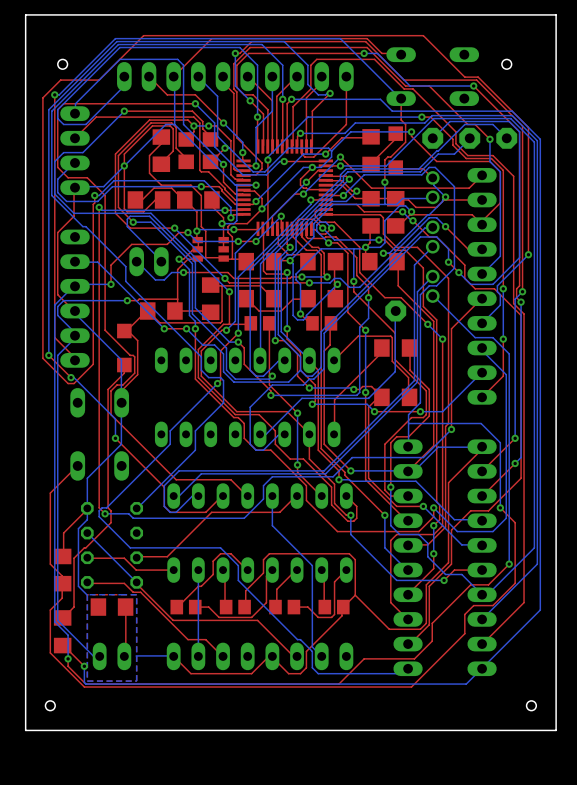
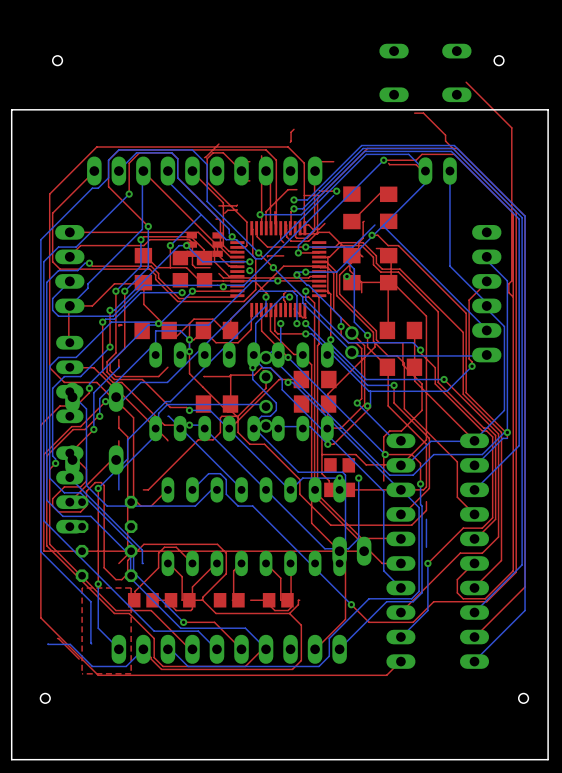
top track: (235, 53) (239, 53) (251, 41) (365, 41) (404, 80) (476, 80) (522, 125) (522, 291) -> none
bottom track: (235, 53) (235, 86) (250, 100) -> none
via: (235, 53) -> none
top track: (364, 53) (248, 53) (236, 65) (236, 87) (244, 94) (253, 94) (267, 109) (267, 146) -> none
bottom track: (364, 53) (377, 53) (410, 86) (473, 86) -> none
via: (364, 53) -> none
top track: (401, 54) (381, 53) (367, 38) (211, 38) (173, 76) -> none
bottom track: (124, 76) (124, 86) (85, 124) (63, 124) (57, 118) (57, 109) (119, 47) (239, 47) (257, 65) (257, 117) -> none
top track: (149, 76) (167, 94) (195, 94) (223, 123) -> none
bottom track: (173, 76) (174, 124) -> none
bottom track: (198, 76) (217, 96) (217, 136) (253, 171) (264, 171) (288, 148) (328, 148) (331, 151) -> none
top track: (223, 76) (223, 83) (233, 93) (233, 168) (243, 170) -> none
part position: (235, 76) -> (204, 171)
top track: (247, 76) (272, 100) (272, 146) -> none
bottom track: (272, 76) (272, 111) (256, 127) (256, 165) -> none
top track: (297, 76) (276, 96) (277, 146) -> none
top track: (321, 76) (321, 83) (306, 97) (306, 146) -> none
top track: (346, 76) (346, 124) (313, 157) (304, 157) (301, 154) (301, 146) -> none
via: (473, 86) -> none
top track: (330, 93) (312, 111) (311, 146) -> none
bottom track: (330, 93) (318, 94) (307, 84) (307, 65) (284, 41) (116, 41) (48, 109) (48, 266) -> (129, 194) (76, 247) (58, 247) (43, 261)
via: (330, 93) -> none
top track: (54, 94) (54, 198) -> (304, 228) (304, 163) (288, 147) (96, 147) (49, 194)
bottom track: (54, 94) (59, 94) (115, 38) (340, 38) (401, 98) -> none
via: (54, 94) -> none
top track: (401, 98) (401, 120) (405, 124) (405, 142) (390, 157) (384, 160) (384, 182) -> none
top track: (282, 99) (282, 146) -> none
bottom track: (282, 99) (282, 65) (262, 44) (118, 44) (51, 111) (51, 195) (125, 266) (125, 281) (201, 356) (201, 370) (208, 377) (220, 377) (223, 380) (223, 402) (195, 430) (195, 450) (136, 508) -> none
via: (282, 99) -> none
top track: (291, 99) (287, 103) (287, 146) -> none
bottom track: (291, 99) (380, 99) (392, 111) (512, 111) (540, 139) (540, 610) (532, 617) -> (293, 199) (307, 199) (361, 145) (454, 145) (525, 216) (525, 610)
via: (291, 99) -> none
top track: (250, 100) (263, 114) (262, 146) -> none
via: (250, 100) -> none
top track: (195, 103) (63, 103) (57, 109) (57, 167) (68, 177) (87, 177) (105, 195) (105, 330) (130, 355) (134, 356) (134, 373) (122, 385) -> (189, 410) (186, 407) (170, 407) (142, 379) (117, 379)
bottom track: (195, 103) (214, 123) (214, 146) (242, 174) (266, 174) (279, 161) (284, 161) -> none
via: (195, 103) -> none
top track: (124, 111) (192, 111) (202, 121) (202, 128) (210, 136) (210, 139) -> none
bottom track: (124, 111) (82, 152) (63, 152) (54, 161) (54, 194) (74, 213) (150, 213) (229, 291) -> none
via: (124, 111) -> none
bottom track: (75, 113) (75, 103) (119, 59) (177, 59) (183, 65) (183, 124) (223, 164) -> none
board edge: (556, 113) (556, 14) (25, 14) (25, 730) (556, 730) -> (548, 109) (11, 109) (11, 759) (548, 759) (548, 722)
top track: (257, 117) (258, 146) -> none
via: (257, 117) -> none
bottom track: (421, 117) (307, 117) (267, 157) (267, 160) -> none
via: (421, 117) -> none
bottom track: (223, 123) (242, 142) (242, 152) -> none
via: (223, 123) -> none
bottom track: (174, 124) (235, 185) (256, 185) -> none
bottom track: (174, 124) (165, 124) (103, 186) (75, 187) -> none
via: (193, 125) -> none
top track: (208, 125) (216, 125) (230, 140) (230, 174) (235, 179) (243, 180) -> none
bottom track: (208, 125) (193, 125) -> none
via: (208, 125) -> none
top track: (411, 131) (411, 136) (436, 161) (489, 161) (500, 171) (500, 202) (482, 220) (482, 224) (472, 214) (410, 214) (399, 225) (395, 225) -> none
bottom track: (411, 131) (350, 131) (331, 151) -> none
via: (411, 131) -> none
bottom track: (300, 133) (344, 133) (355, 123) (424, 123) (432, 115) (512, 115) (537, 140) (537, 564) (529, 571) -> (293, 208) (302, 208) (363, 148) (452, 148) (522, 217) (522, 564)
via: (300, 133) -> none
top track: (395, 133) (395, 139) (371, 164) -> none
top track: (371, 136) (341, 137) (325, 154) -> none
top track: (161, 137) (161, 143) (149, 155) (149, 173) (161, 185) (190, 185) (201, 195) (201, 226) (205, 231) (205, 257) -> none
top track: (75, 138) (96, 117) (193, 117) (199, 123) (199, 170) (208, 171) (235, 199) (243, 199) -> none
bottom track: (432, 138) (450, 121) (509, 121) (519, 131) (519, 257) (492, 284) (470, 284) -> (474, 440) (504, 410) (504, 326) (486, 308) (486, 302) (463, 279)
part: (432, 138) -> none
bottom track: (469, 138) (454, 154) (438, 154) (420, 171) (347, 171) (343, 176) (343, 180) (260, 263) (260, 360) -> none
part: (469, 138) -> none
bottom track: (506, 138) (492, 124) (464, 124) (418, 168) (346, 168) (340, 174) (340, 179) (250, 269) (250, 370) (256, 376) (263, 376) (278, 361) (284, 360) -> none
part: (506, 138) -> none
top track: (186, 139) (193, 131) (193, 125) (188, 120) (149, 120) (115, 154) (115, 213) (130, 228) (174, 228) -> none
top track: (489, 139) (475, 124) (467, 124) (429, 86) (405, 86) (367, 47) (250, 47) (233, 63) (233, 88) (236, 91) (236, 137) (262, 162) (262, 168) (256, 174) (243, 175) -> none
bottom track: (489, 139) (489, 161) (500, 171) (500, 256) (482, 274) -> none
via: (489, 139) -> none
top track: (291, 146) (293, 106) (310, 88) (310, 65) (316, 59) (374, 59) (404, 88) (413, 88) (455, 131) (455, 143) (464, 152) -> (286, 232) (286, 236) (291, 241) (308, 241) (317, 232) (317, 198) (367, 148) (457, 148)
via: (225, 148) -> none
part position: (75, 150) -> (69, 269)
part: (161, 150) -> none
part position: (198, 150) -> (192, 269)
part: (371, 150) -> none
part: (395, 150) -> none
bottom track: (331, 151) (331, 157) (321, 167) (303, 167) (262, 208) -> none
top track: (242, 152) (243, 160) -> none
via: (242, 152) -> none
bottom track: (325, 154) (303, 154) (256, 201) -> none
via: (325, 154) -> none
top track: (467, 155) (492, 155) (513, 176) (513, 303) (524, 313) -> (458, 154) (516, 211) (516, 308)
top track: none -> (460, 151) (525, 216) (525, 587) (516, 595)
top track: (340, 157) (371, 188) (469, 188) (482, 175) -> none
bottom track: (340, 157) (303, 194) -> none
via: (340, 157) -> none
top track: (466, 158) (491, 158) (503, 170) (503, 288) -> none
via: (267, 160) -> none
top track: (325, 160) (284, 161) -> none
top track: (186, 161) (185, 157) (176, 148) (176, 127) (171, 123) (150, 123) (118, 155) (118, 207) (133, 222) -> none
via: (284, 161) -> none
bottom track: (75, 162) (57, 179) (57, 192) (66, 201) (97, 201) (112, 186) (201, 186) -> none
top track: (161, 164) (173, 151) (173, 128) (170, 125) (152, 125) (124, 154) (124, 208) (127, 211) (143, 211) (155, 199) (162, 199) -> none
top track: (223, 164) (223, 182) (235, 194) (243, 194) -> none
via: (223, 164) -> none
bottom track: none -> (383, 160) (298, 245) (298, 252)
via: (124, 165) -> none
via: (256, 165) -> none
bottom track: (340, 165) (386, 165) (433, 118) (510, 118) (534, 142) (534, 547) (488, 593) (482, 594) (461, 574) (445, 574) (427, 556) (427, 543) (418, 534) (399, 534) (390, 525) -> (400, 587) (383, 570) (383, 519)
via: (340, 165) -> none
top track: (312, 167) (300, 179) (300, 185) (307, 189) (325, 190) -> none
via: (312, 167) -> none
top track: (325, 170) (318, 170) (306, 182) -> none
bottom track: none -> (118, 171) (136, 152) (171, 152) (177, 158) (177, 177) (229, 229) (229, 233)
top track: none -> (143, 171) (217, 245) (217, 254) (229, 266) (237, 266)
bottom track: none -> (167, 171) (168, 182) (226, 239) (236, 239) (255, 258) (261, 258) (366, 154) (408, 154) (425, 171) (424, 183) (336, 272) (320, 272)
top track: none -> (192, 171) (223, 202) (223, 245) (229, 251) (237, 252)
top track: none -> (241, 171) (223, 152) (213, 152) (207, 158) (207, 182) (246, 222) (246, 245) (237, 247)
top track: none -> (266, 171) (270, 176) (271, 228)
top track: (325, 175) (346, 176) (349, 179) -> none
part: none -> (437, 171)
bottom track: none -> (449, 171) (451, 267)
bottom track: (432, 177) (433, 185) (445, 197) (389, 253) (383, 253) -> none
bottom track: (349, 179) (275, 253) (275, 340) -> none
via: (349, 179) -> none
top track: (325, 180) (341, 180) (352, 191) (356, 191) -> none
bottom track: (306, 182) (235, 253) (235, 321) (226, 330) -> none
via: (306, 182) -> none
bottom track: (384, 182) (384, 204) -> none
via position: (384, 182) -> (383, 160)
bottom track: (236, 185) (236, 220) (233, 223) (222, 223) -> none
via: (256, 185) -> none
top track: (325, 185) (341, 185) (355, 198) (408, 199) (415, 207) (436, 207) (444, 199) (482, 199) -> none
top track: (201, 186) (219, 186) (235, 204) (253, 204) (256, 201) -> none
via: (201, 186) -> none
top track: (75, 187) (74, 216) (57, 232) -> (94, 171) (52, 213) (52, 227)
part position: (284, 187) -> (278, 269)
part: (432, 187) -> none
top track: (243, 190) (254, 191) (262, 198) (262, 208) (247, 223) (230, 223) (227, 226) (227, 232) (232, 236) (232, 259) -> none
bottom track: (356, 191) (346, 201) (331, 201) (296, 236) (296, 250) (281, 260) (281, 331) (309, 360) -> none
via: (356, 191) -> none
via: (303, 194) -> none
top track: (94, 195) (93, 364) (74, 383) (68, 383) (42, 358) (42, 97) (60, 80) (99, 80) (143, 35) (423, 35) (464, 77) (478, 77) (528, 127) (528, 254) -> none
bottom track: (94, 195) (99, 195) (113, 180) (204, 180) (230, 207) (230, 217) -> none
via: (94, 195) -> none
bottom track: (343, 195) (364, 174) (421, 174) (429, 167) (435, 167) (454, 186) (454, 268) (436, 285) (429, 285) (420, 294) (420, 402) (408, 414) (408, 446) -> (357, 403) (394, 439) (400, 440)
top track: none -> (388, 190) (382, 191) (351, 221)
bottom track: (432, 197) (402, 198) (396, 204) (333, 204) (313, 223) (313, 236) (290, 260) (293, 263) (293, 315) (297, 319) (303, 319) (337, 284) -> none
via: (445, 197) -> none
top track: none -> (129, 194) (129, 163) (139, 152) (171, 152) (177, 158) (177, 177) (220, 220) (220, 247) (230, 257) (237, 257)
via: none -> (129, 194)
top track: (135, 199) (142, 199) (153, 188) (171, 188) (196, 211) (198, 247) -> none
part: (149, 199) -> none
part: (198, 199) -> none
top track: (211, 199) (213, 207) (223, 217) (223, 249) -> none
bottom track: (310, 199) (310, 204) (238, 276) (238, 333) -> none
via: (310, 199) -> none
bottom track: none -> (333, 195) (243, 285) (143, 285) (112, 316) (58, 316)
via: (256, 201) -> none
via: none -> (293, 199)
top track: (325, 204) (356, 204) (364, 211) (402, 211) -> none
top track: (99, 207) (99, 507) (105, 513) -> none
bottom track: (99, 207) (102, 210) (225, 210) -> none
via: (99, 207) -> none
via: (262, 208) -> none
top track: (325, 209) (316, 210) (315, 216) (321, 222) (334, 222) (359, 247) (359, 272) (384, 297) (401, 297) (427, 324) -> none
via: (225, 210) -> none
bottom track: (402, 211) (413, 220) -> none
via: (402, 211) -> none
bottom track: (411, 211) (405, 205) (399, 205) (384, 220) (384, 242) (380, 247) (321, 248) (296, 274) (296, 279) (300, 284) (300, 313) -> none
via: (411, 211) -> none
part: none -> (351, 207)
part: (371, 212) -> none
via: none -> (293, 208)
top track: (325, 214) (380, 214) (383, 217) (383, 234) (396, 247) (417, 247) (448, 278) (448, 423) (445, 426) (445, 527) (427, 544) (408, 545) -> none
bottom track: (281, 216) (256, 241) -> none
via: (281, 216) -> none
via: (230, 217) -> none
bottom track: none -> (201, 214) (170, 245)
via: none -> (260, 214)
top track: (297, 220) (313, 219) (322, 228) -> (291, 216) (291, 211) (293, 208)
top track: (413, 220) (429, 236) (436, 236) (464, 265) (464, 278) (475, 288) (494, 288) (521, 315) -> (383, 160) (416, 160) (422, 154) (454, 154) (513, 213) (513, 310)
via: (413, 220) -> none
bottom track: (133, 222) (150, 222) (192, 263) (192, 313) (226, 348) (226, 370) (235, 379) (269, 379) (272, 376) -> none
via: (133, 222) -> none
via: (222, 223) -> none
top track: (445, 226) (467, 248) (482, 249) -> none
bottom track: (445, 226) (436, 217) (429, 217) (359, 287) (349, 287) (340, 278) (334, 278) (330, 282) (309, 282) -> none
via: (445, 226) -> none
bottom track: (432, 227) (424, 228) (321, 331) (321, 367) (312, 376) (306, 376) (300, 370) -> none
bottom track: (174, 228) (225, 278) -> none
via: (174, 228) -> none
top track: (258, 228) (233, 229) -> none
top track: (277, 228) (278, 244) (288, 254) (301, 254) (307, 261) -> none
bottom track: (322, 228) (334, 239) (378, 239) -> none
via: (322, 228) -> none
bottom track: (331, 228) (325, 222) (319, 222) (316, 225) (316, 231) (328, 242) -> none
via: (331, 228) -> none
bottom track: (233, 229) (196, 231) -> none
via: (233, 229) -> none
bottom track: none -> (374, 224) (352, 247) (305, 247)
bottom track: none -> (383, 224) (486, 330)
top track: none -> (148, 226) (108, 186) (108, 160) (118, 149) (266, 149) (276, 160) (275, 228)
bottom track: none -> (148, 226) (148, 267) (124, 291)
via: none -> (148, 226)
via: (196, 231) -> none
top track: (188, 232) (179, 232) (167, 244) -> (192, 242) (189, 239) (161, 239)
bottom track: (188, 232) (196, 241) (238, 241) -> none
via: (188, 232) -> none
top track: none -> (251, 228) (252, 255) (255, 258) (255, 289) (243, 301) (177, 301) (155, 279) (155, 275) (149, 269) (60, 269) (52, 261)
top track: none -> (69, 232) (198, 232) (214, 248) (214, 261) (229, 276) (237, 276)
top track: (293, 236) (306, 250) (316, 250) (321, 254) (321, 308) -> (285, 310) (283, 294) (286, 291) (296, 291) (302, 297) (308, 297) (314, 302)
top track: (301, 236) (312, 247) (318, 247) (324, 253) (324, 274) (327, 276) -> (295, 232) (296, 238) (307, 238) (314, 230) (315, 171)
part: (432, 236) -> none
top track: (256, 241) (238, 241) -> none
via: (256, 241) -> none
top track: (263, 241) (263, 271) (266, 274) (287, 272) -> (257, 236) (267, 247) (305, 247)
top track: (328, 242) (337, 242) (347, 253) (347, 312) (365, 330) -> none
via: (328, 242) -> none
top track: none -> (140, 239) (143, 236) (190, 236) (204, 250) (204, 258)
bottom track: none -> (140, 239) (140, 266) (115, 291)
via: none -> (140, 239)
top track: (155, 244) (131, 244) (111, 265) (111, 284) -> (149, 239) (143, 245) (80, 245) (69, 256)
bottom track: (432, 246) (414, 265) (414, 380) (324, 470) (179, 470) (164, 485) (164, 506) (170, 512) -> (69, 391) (86, 408) (86, 485) (107, 506) (164, 506)
bottom track: (290, 247) (278, 259) (278, 334) (300, 356) (300, 370) -> none
via: (290, 247) -> none
via: (365, 247) -> none
top track: (198, 248) (192, 250) (183, 259) (179, 259) -> (192, 244) (192, 264) (195, 267)
bottom track: (353, 248) (353, 281) -> none
top track: none -> (170, 245) (170, 267)
via: none -> (170, 245)
via: none -> (186, 245)
via: none -> (305, 247)
top track: none -> (319, 247) (335, 247) (339, 242) (363, 242) (376, 255) (376, 263) (382, 269) (399, 269) (463, 332) (463, 394) (501, 432) (501, 560) (474, 587)
via: (383, 253) -> none
bottom track: (528, 254) (497, 285) (497, 291) (500, 294) (500, 305) (482, 323) -> none
via: (528, 254) -> none
top track: none -> (258, 252) (273, 267)
bottom track: none -> (258, 252) (207, 201) (207, 164) (192, 149) (118, 149) (108, 160) (108, 177) (98, 188) (92, 188) (40, 239) (40, 551) (90, 601) (91, 643)
via: none -> (258, 252)
via: none -> (298, 252)
top track: none -> (319, 252) (298, 252)
bottom track: (179, 259) (189, 269) (189, 315) (195, 321) (195, 328) -> none
via: (179, 259) -> none
top track: none -> (143, 255) (157, 267) (177, 267)
via: (290, 260) -> none
top track: none -> (351, 255) (351, 263) (339, 275) (339, 294) (376, 330) (376, 339) (379, 342) (402, 342)
bottom track: (75, 261) (97, 262) (164, 328) -> none
bottom track: (136, 261) (155, 279) (164, 279) (171, 272) (183, 272) -> none
part: (149, 261) -> none
bottom track: (161, 261) (127, 226) (127, 219) (130, 216) (149, 216) (195, 262) (195, 308) (229, 342) (238, 342) -> none
top track: (246, 261) (244, 259) (223, 257) (188, 259) (177, 269) (177, 311) -> none
part: (260, 261) -> none
part: (321, 261) -> none
top track: none -> (319, 257) (329, 257) (341, 245) (361, 245) (373, 257) (373, 264) (380, 272) (398, 272) (438, 311) (438, 382) (483, 428) (488, 428) (495, 435) (495, 519) (474, 538)
part: (383, 261) -> none
top track: (448, 262) (458, 272) -> none
bottom track: (448, 262) (448, 248) (436, 236) (420, 236) (324, 333) (324, 368) (313, 379) (309, 379) (303, 385) (272, 385) (250, 407) (250, 444) (256, 450) (263, 450) (278, 435) (284, 434) -> none
via: (448, 262) -> none
top track: (57, 266) (57, 294) (74, 311) -> (69, 342) (68, 305)
bottom track: none -> (249, 261) (202, 261) (186, 245) (179, 245) (114, 310) (110, 310)
via: none -> (249, 261)
top track: none -> (319, 261) (326, 261) (336, 272) (336, 295) (373, 332) (373, 341) (388, 355) (397, 355) (404, 363) (404, 408) (457, 461) (457, 497) (474, 514)
bottom track: none -> (346, 261) (354, 269) (354, 322) (367, 335)
top track: none -> (89, 263) (92, 266) (151, 266) (158, 273) (158, 277) (179, 298) (237, 295)
bottom track: none -> (89, 263) (85, 263) (77, 270) (58, 270) (46, 282) (46, 500) (62, 516) (90, 516) (130, 556) (130, 578) (180, 628) (245, 628) (266, 649)
via: none -> (89, 263)
top track: (423, 268) (423, 306) (436, 319) (436, 444) -> (416, 263) (466, 313) (466, 392) (507, 433) (507, 438)
via: (183, 272) -> none
top track: (201, 272) (192, 272) -> (204, 280) (198, 279) (186, 267)
top track: (216, 272) (227, 272) (233, 278) (301, 276) -> none
bottom track: none -> (273, 267) (302, 297) (302, 302) (355, 355) (486, 354)
via: none -> (273, 267)
bottom track: (287, 272) (287, 328) -> none
via: (287, 272) -> none
via: (458, 272) -> none
part: none -> (143, 269)
part: none -> (351, 269)
part: none -> (388, 269)
via: none -> (249, 270)
via: (301, 276) -> none
via: none -> (305, 272)
via: (327, 276) -> none
bottom track: (432, 276) (417, 291) (417, 382) (325, 473) (201, 473) (179, 496) (173, 496) -> none
via: (225, 278) -> none
bottom track: none -> (296, 275) (341, 317) (341, 326)
via: none -> (296, 275)
top track: none -> (319, 276) (302, 277)
top track: (353, 281) (353, 291) (395, 333) -> (354, 269) (354, 282) (351, 282) (388, 282) (388, 328)
via: (309, 282) -> none
bottom track: (111, 284) (76, 284) (54, 305) (54, 371) -> (192, 291) (161, 322) (111, 322) (76, 357) (58, 357) (49, 366)
via: (111, 284) -> none
via: (337, 284) -> none
top track: (222, 285) (220, 322) (159, 322) (146, 311) (127, 330) (137, 340) (137, 374) (122, 389) (121, 402) -> none
top track: none -> (277, 280) (319, 281)
bottom track: none -> (277, 280) (252, 280) (208, 325) (148, 325) (89, 383) (89, 388)
via: none -> (277, 280)
part: (432, 286) -> none
part: (482, 286) -> none
top track: none -> (486, 281) (469, 300) (469, 358) (472, 361) (472, 366)
bottom track: (503, 288) (503, 339) -> none
via: (503, 288) -> none
top track: (229, 291) (229, 324) -> none
bottom track: (522, 291) (515, 299) -> (486, 256) (486, 260) (507, 280) (507, 294)
via: (522, 291) -> none
top track: none -> (237, 290) (192, 291)
top track: none -> (319, 290) (327, 291) (330, 294) (330, 339)
via: none -> (115, 291)
top track: none -> (124, 291) (124, 348) (110, 363) (110, 370) (115, 376) (158, 376) (167, 367)
via: none -> (124, 291)
via: none -> (192, 291)
bottom track: none -> (305, 291) (305, 300) (348, 342) (413, 342) (420, 350)
via: none -> (305, 291)
bottom track: (432, 296) (475, 337) (492, 337) (509, 353) (509, 564) -> none
bottom track: none -> (182, 292) (140, 292) (114, 319) (105, 319) (102, 322)
via: none -> (182, 292)
bottom track: (368, 297) (368, 318) (359, 327) (359, 392) (356, 395) (270, 395) -> none
via: (368, 297) -> none
part: (75, 298) -> none
part: (210, 298) -> none
part: (260, 298) -> none
top track: (308, 298) (293, 299) (281, 311) (259, 311) (246, 298) -> none
part: (321, 298) -> none
top track: (482, 298) (451, 328) (451, 429) -> none
part: none -> (486, 293)
top track: (177, 299) (127, 300) -> none
bottom track: (127, 300) (63, 300) (57, 306) -> (69, 281) (52, 298) (52, 301)
via: (127, 300) -> none
bottom track: none -> (266, 297) (266, 305) (170, 401) (165, 401) (127, 439) (127, 458) (98, 488)
via: none -> (266, 297)
via: none -> (289, 297)
bottom track: (521, 302) (521, 457) -> (260, 214) (301, 214) (364, 151) (451, 151) (519, 219) (519, 445) (513, 451)
via: (521, 302) -> none
top track: none -> (69, 305) (92, 305) (114, 283) (143, 282) (143, 304) (176, 336) (193, 319) (213, 319) (223, 329) (230, 330) (230, 319) (283, 266) (327, 267) (333, 273) (333, 310) (351, 328) (351, 332) (364, 345) (364, 404) (341, 428) (329, 428) (321, 435) (321, 473) (329, 481) (330, 489)
bottom track: (75, 311) (75, 313) (121, 359) (121, 444) (87, 478) (87, 519) (78, 528) (78, 586) (87, 595) -> (70, 305) (87, 288) (87, 283) (142, 229) (143, 171)
part: (161, 311) -> none
top track: (174, 311) (210, 312) -> none
bottom track: (395, 311) (395, 371) (368, 398) (301, 398) (266, 433) (260, 434) -> none
part: (395, 311) -> none
via: (300, 313) -> none
top track: none -> (110, 310) (110, 347)
via: none -> (110, 310)
top track: none -> (251, 310) (251, 329) (238, 342) (215, 342) (203, 330) (193, 339) (189, 339)
top track: none -> (261, 310) (261, 330) (288, 357)
top track: none -> (271, 310) (270, 330) (293, 354) (301, 354)
top track: none -> (275, 310) (274, 330) (277, 333) (305, 333)
bottom track: (63, 321) (74, 331) (75, 335) (74, 339) (57, 355) (57, 393) -> (110, 347) (80, 376) (64, 376) (52, 388)
top track: (250, 323) (223, 324) (198, 349) (198, 377) (235, 414) (259, 414) (275, 430) (275, 444) (290, 459) (303, 459) (331, 487) (331, 504) (347, 521) (353, 521) (356, 518) (356, 506) (346, 496) -> none
part: (260, 323) -> none
top track: (269, 323) (269, 385) (297, 413) -> none
part: (321, 323) -> none
top track: (330, 323) (330, 345) (325, 349) -> (319, 295) (319, 344)
bottom track: (427, 324) (442, 339) -> none
via: (427, 324) -> none
top track: none -> (102, 322) (102, 372) (112, 382) (121, 382) (164, 425) (189, 425)
via: none -> (102, 322)
top track: (186, 328) (164, 328) -> none
bottom track: (186, 328) (202, 345) (214, 345) (223, 353) (223, 371) (233, 382) (288, 382) (300, 370) -> none
via: (186, 328) -> none
via: (195, 328) -> none
bottom track: none -> (296, 323) (296, 295) (292, 291) (258, 291) (167, 382) (140, 382) (121, 401) (105, 401)
via: none -> (296, 323)
bottom track: none -> (305, 323) (367, 385) (394, 385)
via: none -> (305, 323)
top track: (226, 330) (222, 330) (201, 350) (201, 376) (236, 411) (287, 411) (309, 433) (309, 459) (334, 484) (334, 503) (346, 515) (350, 515) -> none
via: (226, 330) -> none
bottom track: (365, 330) (365, 392) -> none
via: (365, 330) -> none
top track: none -> (341, 326) (341, 335) (348, 342) (355, 342) (361, 348) (361, 398) (357, 403)
via: none -> (341, 326)
top track: (238, 333) (220, 350) (220, 380) (217, 383) -> none
via: (238, 333) -> none
top track: (287, 333) (287, 339) (300, 352) (300, 370) (315, 385) (315, 401) (312, 404) -> none
bottom track: none -> (280, 328) (280, 342) (266, 357)
top track: (395, 334) (395, 359) (421, 386) -> (414, 330) (414, 380)
part: none -> (155, 330)
part: none -> (216, 330)
part: none -> (400, 330)
top track: (54, 337) (74, 356) (75, 360) -> (49, 332) (49, 367) (64, 382) (96, 382) (133, 417) (133, 498) (140, 506) (151, 506) (167, 489)
bottom track: none -> (305, 333) (311, 333) (369, 391) (447, 391) (472, 366)
via: none -> (305, 333)
top track: (442, 339) (442, 373) -> (420, 350) (420, 353) (435, 367)
via: (442, 339) -> none
top track: (503, 339) (503, 376) (482, 397) -> none
via: (503, 339) -> none
top track: (275, 340) (284, 340) (297, 353) (297, 376) (309, 387) -> none
via: (275, 340) -> none
top track: none -> (367, 335) (367, 347) (388, 367) (388, 406) (426, 444) (426, 486) (423, 489) (400, 489)
via: none -> (367, 335)
top track: (238, 342) (244, 348) (244, 364) (270, 390) (270, 395) -> none
via: (238, 342) -> none
via: none -> (189, 339)
bottom track: none -> (330, 339) (330, 344) (366, 379) (444, 379)
via: none -> (330, 339)
part: (124, 348) -> none
part: none -> (351, 342)
part: (395, 348) -> none
bottom track: (482, 348) (482, 350) (506, 374) (506, 518) (492, 531) (457, 531) (433, 507) -> none
via: none -> (110, 347)
top track: (48, 355) (71, 377) -> none
bottom track: none -> (43, 350) (43, 520) (154, 631) (198, 631) (216, 649)
via: (48, 355) -> none
via: none -> (420, 350)
bottom track: none -> (189, 351) (189, 339) (180, 330) (155, 330) (155, 342) (99, 398) (99, 416)
via: none -> (189, 351)
top track: (334, 360) (358, 336) (390, 336) (392, 361) (408, 377) (409, 397) -> none
bottom track: none -> (288, 357) (385, 454)
via: none -> (288, 357)
via: none -> (472, 366)
top track: none -> (69, 367) (93, 367) (167, 440)
top track: (124, 372) (108, 389) (108, 507) (111, 510) (111, 522) (74, 558) (74, 607) (62, 617) -> none
bottom track: none -> (118, 367) (93, 392) (93, 429)
part: none -> (266, 367)
part: none -> (400, 367)
bottom track: (482, 372) (442, 411) (420, 411) -> none
bottom track: none -> (252, 367) (252, 379) (276, 403) (276, 410) (270, 416) (261, 416) (255, 422) (255, 429) (298, 472) (342, 472) (345, 475) (345, 542)
via: none -> (252, 367)
via: (272, 376) -> none
bottom track: (71, 377) (74, 377) (115, 419) (115, 438) -> none
via: (71, 377) -> none
top track: none -> (229, 376) (204, 376)
top track: none -> (229, 376) (230, 404)
top track: none -> (229, 376) (254, 375) (261, 367) (270, 367) (282, 379)
top track: none -> (266, 376) (266, 388) (238, 416) (220, 417) (220, 432) (213, 439) (198, 439) (148, 489) (143, 489)
bottom track: (217, 383) (170, 430) (170, 444) (106, 507) (102, 507) (99, 510) (99, 516) (130, 547) (220, 547) (238, 565) (238, 580) (297, 639) (300, 639) (312, 651) (312, 667) (318, 673) -> none
via: (217, 383) -> none
part: none -> (69, 379)
top track: (119, 385) (116, 385) (111, 390) (111, 414) (176, 479) (230, 479) (247, 496) -> (114, 379) (107, 372) (107, 361) (115, 353) (115, 291)
top track: none -> (301, 379) (279, 379) (230, 428)
part: none -> (315, 379)
via: none -> (444, 379)
via: none -> (288, 382)
bottom track: (309, 387) (353, 389) -> none
via: (309, 387) -> none
top track: (353, 389) (371, 386) (381, 396) (381, 397) (380, 395) (368, 407) (368, 478) (396, 506) (423, 506) -> none
via: (353, 389) -> none
top track: (442, 389) (442, 525) (433, 534) (396, 534) (390, 540) (390, 602) (408, 619) -> (444, 379) (498, 433) (498, 536) (482, 553) (460, 553) (400, 612)
top track: none -> (435, 383) (482, 431) (486, 431) (492, 436) (492, 517) (482, 528) (463, 528) (427, 563)
top track: none -> (394, 385) (394, 403) (429, 438)
via: none -> (394, 385)
top track: (426, 390) (426, 414) (423, 417) (411, 417) (384, 444) (384, 490) (390, 496) -> (419, 385) (474, 440)
top track: (365, 392) (365, 479) (408, 520) -> none
via: (365, 392) -> none
top track: none -> (89, 388) (89, 392) (76, 406) (60, 406) (40, 425) (40, 617) (98, 675) (386, 675) (400, 661)
via: none -> (89, 388)
via: (270, 395) -> none
bottom track: none -> (370, 391) (370, 407)
part: (395, 397) -> none
bottom track: (312, 404) (367, 404) (374, 411) -> none
via: (312, 404) -> none
top track: none -> (105, 401) (80, 426) (71, 426) (43, 454) (43, 551) (364, 551)
via: none -> (105, 401)
via: none -> (357, 403)
part: none -> (216, 404)
part: none -> (315, 404)
top track: (420, 411) (374, 411) -> none
via: (420, 411) -> none
bottom track: none -> (266, 406) (264, 404) (167, 404) (158, 413) (158, 432) (118, 472) (118, 489)
bottom track: (297, 413) (297, 464) -> none
via: (297, 413) -> none
top track: none -> (370, 407) (333, 444) (327, 444)
bottom track: none -> (189, 410) (210, 410) (289, 489) (302, 478) (339, 478)
via: none -> (189, 410)
via: none -> (99, 416)
top track: none -> (118, 416) (118, 428) (127, 436) (127, 554) (118, 563)
bottom track: none -> (167, 416) (241, 489)
part: none -> (266, 416)
bottom track: (408, 423) (481, 423) (500, 442) (500, 507) -> none
bottom track: (451, 429) (423, 457) (352, 457) (333, 476) (272, 476) (263, 485) (263, 499) (244, 518) (133, 518) (128, 513) (105, 513) -> none
via: (451, 429) -> none
bottom track: none -> (189, 425) (201, 425) (324, 548) (348, 548) (358, 538) (358, 478)
via: none -> (189, 425)
bottom track: none -> (266, 425) (310, 426) (327, 444)
top track: none -> (93, 429) (70, 453)
via: none -> (93, 429)
top track: (115, 438) (164, 487) (164, 506) (170, 512) (205, 512) (223, 496) -> none
via: (115, 438) -> none
top track: (515, 438) (482, 471) -> none
top track: (324, 444) (350, 470) -> (317, 438) (317, 494) (361, 538) (400, 538)
bottom track: none -> (507, 438) (502, 438) (474, 465)
top track: none -> (118, 440) (118, 453) (69, 502)
top track: (482, 446) (481, 450) (448, 482) (448, 562) (426, 584) (426, 623) -> none
top track: (321, 448) (384, 515) -> (314, 442) (314, 495) (382, 563) (400, 563)
top track: (318, 450) (338, 470) (338, 479) -> (311, 444) (311, 523) (339, 551)
via: none -> (327, 444)
top track: none -> (70, 453) (86, 469) (86, 481) (80, 486) (64, 486) (52, 498) (52, 506) (58, 511) (80, 511) (86, 506) (86, 491) (95, 482) (101, 482) (104, 485) (104, 567) (115, 579) (121, 579) (127, 573) (127, 560) (143, 544) (217, 544) (226, 553) (226, 573) (202, 597) (202, 600)
top track: none -> (321, 454) (355, 454) (366, 464) (400, 465)
top track: none -> (385, 454) (411, 454) (420, 463) (420, 484)
via: none -> (385, 454)
bottom track: (57, 462) (57, 620) (93, 655) (99, 656) -> (52, 456) (55, 458) (55, 463)
top track: (515, 463) (482, 496) -> none
bottom track: none -> (507, 457) (474, 489)
via: (515, 463) -> none
top track: (297, 464) (297, 472) (321, 496) -> none
via: (297, 464) -> none
top track: (77, 465) (50, 493) (50, 564) (62, 575) (62, 583) (62, 598) (50, 610) (50, 652) (84, 687) (411, 687) (464, 633) (464, 614) (473, 605) -> none
top track: none -> (55, 463) (49, 469) (49, 544) (115, 610) (151, 610) (189, 648) (192, 649)
via: none -> (55, 463)
bottom track: (350, 470) (408, 471) -> none
via: (350, 470) -> none
part: none -> (339, 465)
top track: (521, 478) (488, 510) (470, 510) (451, 530) (451, 564) (429, 586) (429, 624) (408, 644) -> none
bottom track: (338, 479) (396, 481) -> (266, 357) (268, 354) (389, 475)
via: (338, 479) -> none
bottom track: (415, 481) (454, 519) (482, 520) -> (408, 475) (413, 475) (433, 454) (482, 454) (507, 429)
bottom track: none -> (69, 477) (142, 550) (143, 563)
bottom track: (54, 484) (54, 621) (68, 635) (68, 658) -> (49, 478) (64, 492) (80, 492) (133, 545) (133, 572) (183, 622)
via: none -> (339, 478)
via: none -> (358, 478)
bottom track: (390, 487) (390, 497) -> (289, 297) (282, 297) (255, 323) (255, 360) (263, 367) (270, 367) (282, 379) (282, 389) (383, 491)
via: (390, 487) -> none
via: none -> (420, 484)
top track: none -> (98, 488) (98, 584)
top track: (436, 494) (436, 501) (439, 504) (439, 519) (433, 525) -> (429, 488) (404, 513) (400, 514)
part: none -> (69, 489)
bottom track: (198, 496) (192, 496) (176, 512) -> (216, 489) (211, 489) (195, 506) (170, 506)
bottom track: (272, 496) (272, 525) -> (192, 489) (208, 473) (220, 473) (226, 479) (226, 494) (238, 506) (252, 506) (266, 519)
top track: (297, 496) (279, 512) (211, 512) (170, 553) -> (192, 563) (176, 547) (164, 547)
part: none -> (339, 489)
top track: none -> (383, 489) (348, 489)
bottom track: (423, 506) (427, 510) -> (420, 484) (420, 504)
via: (423, 506) -> none
via: (433, 507) -> none
top track: (500, 507) (515, 522) (515, 583) -> (513, 472) (513, 570) (507, 576)
via: (500, 507) -> none
top track: (87, 508) (63, 533) (62, 556) -> none
bottom track: (429, 512) (461, 544) (482, 545) -> (422, 506) (422, 592) (413, 601) (386, 601) (339, 649)
via position: (105, 513) -> (98, 488)
bottom track: (350, 515) (350, 534) (396, 580) (444, 580) -> none
via: (350, 515) -> none
bottom track: (384, 515) (384, 547) (408, 570) -> none
via: (384, 515) -> none
via: (433, 525) -> none
bottom track: (87, 533) (136, 582) -> none
top track: none -> (345, 542) (345, 619) (315, 649)
top track: (433, 553) (433, 568) (408, 594) -> none
via: (433, 553) -> none
top track: (167, 556) (136, 557) -> (161, 550) (158, 553) (158, 567) (135, 591) (134, 600)
top track: (87, 557) (124, 558) (136, 570) (173, 570) -> (183, 600) (182, 576) (167, 563)
part: none -> (351, 551)
top track: (509, 564) (488, 584) (470, 584) (432, 623) (432, 641) (414, 658) (364, 658) (338, 684) (85, 684) (68, 666) (68, 658) -> none
via: (509, 564) -> none
bottom track: (312, 565) (312, 647) (321, 656) -> (305, 559) (351, 604)
part: (62, 570) -> none
bottom track: (198, 570) (198, 656) -> none
top track: (223, 570) (225, 571) (226, 607) -> (216, 563) (192, 587) (190, 610) (176, 610) (165, 600) (152, 600)
top track: (247, 570) (230, 553) (220, 553) (213, 561) (213, 574) (176, 607) -> (241, 563) (233, 570) (232, 600)
top track: (272, 570) (266, 575) (266, 602) (251, 617) (219, 617) -> (266, 563) (280, 578) (281, 600)
top track: (297, 570) (276, 589) (275, 607) -> (290, 563) (291, 607) (288, 610) (274, 610) (264, 600) (250, 600)
top track: (321, 570) (324, 571) (324, 607) -> none
top track: (346, 570) (334, 581) (334, 614) (331, 617) (318, 617) (306, 607) -> none
bottom track: none -> (427, 563) (427, 610) (400, 637)
via: none -> (427, 563)
top track: (481, 570) (454, 570) (444, 580) -> (473, 563) (457, 579) (457, 592) (463, 598) (466, 598)
top track: (524, 578) (524, 602) -> (516, 572) (486, 601) (433, 601) (419, 616)
via: (444, 580) -> none
top track: (87, 582) (124, 583) (133, 592) (140, 592) (188, 639) (205, 639) (223, 656) -> none
top track: (136, 582) (173, 620) (222, 620) -> (213, 610) (215, 613)
bottom track: none -> (98, 584) (98, 628) (118, 649)
via: none -> (98, 584)
bottom zone outline: (136, 594) (87, 594) (87, 681) (136, 681) (136, 594) -> none
top track: (355, 595) (389, 629) -> (351, 604) (369, 622) (382, 622)
top track: (355, 595) (355, 559) (349, 553) (269, 553) (263, 559) (263, 573) (245, 590) (244, 607) -> none
top track: (355, 595) (341, 607) (341, 615) (306, 651) (306, 667) (300, 673) (288, 673) (272, 656) -> none
part: (112, 607) -> none
top track: (125, 607) (124, 656) -> none
part: none -> (143, 600)
top track: (304, 607) (293, 607) -> (298, 600) (298, 604) (289, 613)
part: (334, 607) -> none
via: none -> (351, 604)
top track: (257, 620) (293, 655) (297, 656) -> (251, 613) (289, 613)
top track: none -> (289, 613) (301, 625) (301, 660) (292, 669) (161, 669) (143, 649)
top track: none -> (183, 622) (214, 622) (241, 649)
via: none -> (183, 622)
part: (62, 631) -> none
bottom track: none -> (47, 643) (70, 644) (92, 666) (126, 666) (143, 649)
bottom track: (136, 655) (173, 656) -> (311, 666) (188, 666) (171, 650) (167, 649)
part: (112, 656) -> none
top track: (173, 656) (190, 673) -> (99, 416) (85, 429) (73, 429) (46, 456) (46, 545) (114, 613) (129, 613) (154, 638) (154, 657) (163, 666) (185, 666)
part: (210, 656) -> none
part: none -> (229, 649)
part: (309, 656) -> none
via: (68, 658) -> none
bottom track: (84, 666) (85, 684) (466, 684) (482, 668) -> none
via: (84, 666) -> none
bottom track: (408, 668) (402, 673) (325, 673) -> (288, 382) (292, 382) (419, 507) (419, 591) (411, 598) (369, 598) (329, 638) (329, 656) (319, 666)

